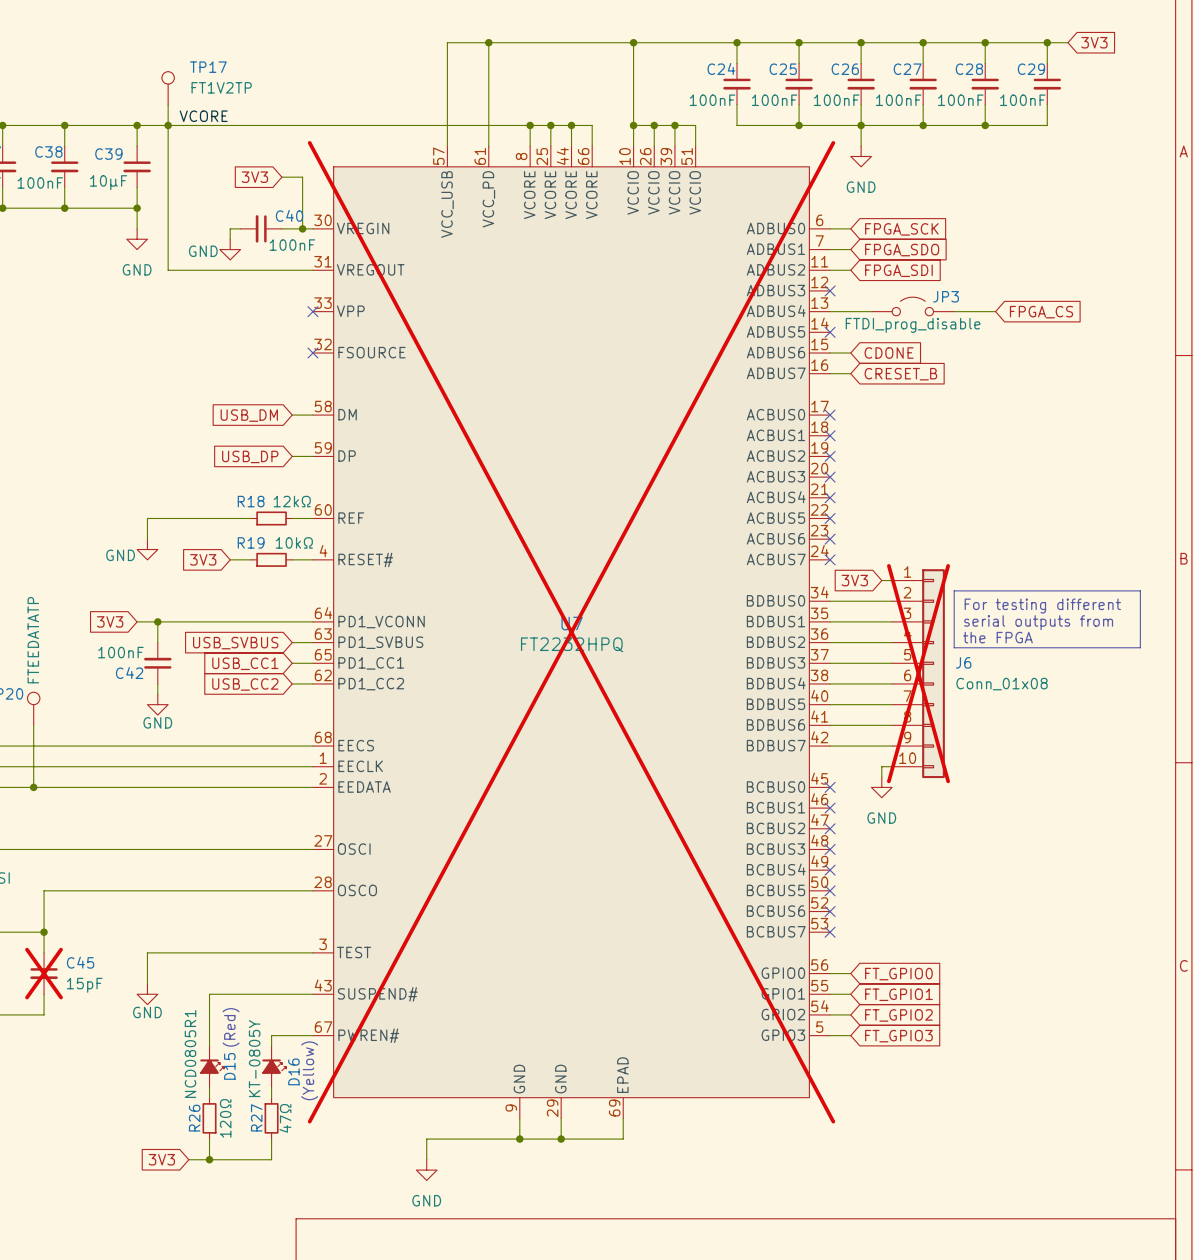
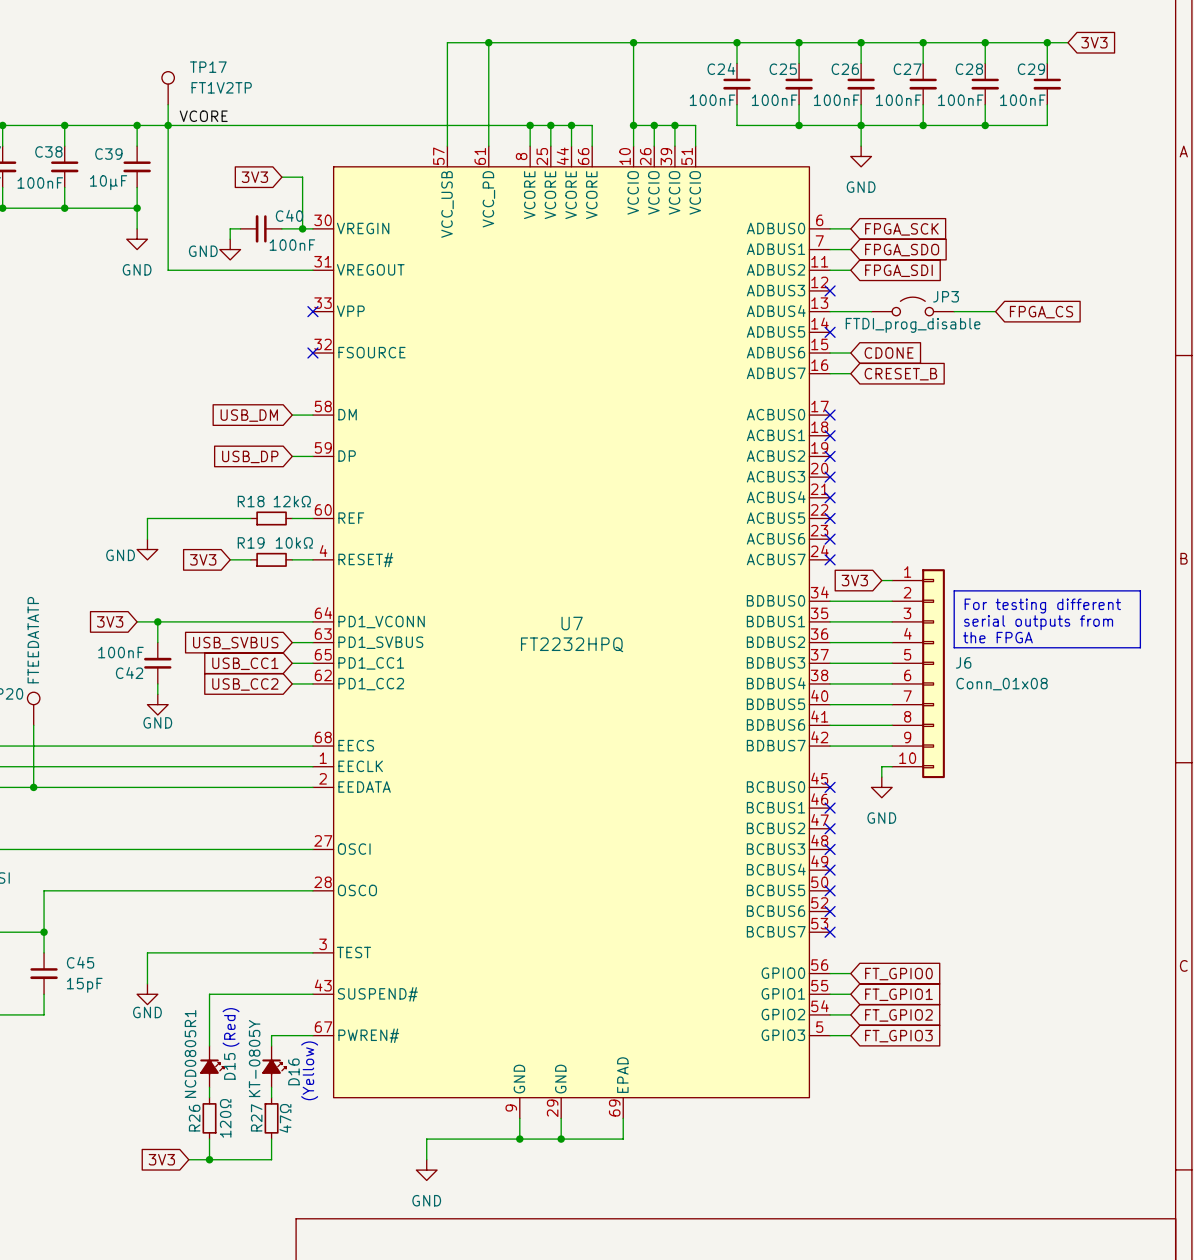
U7 do-not-place cross: (571, 632) -> none
J6 do-not-place cross: (918, 673) -> none
C45 do-not-place cross: (44, 973) -> none

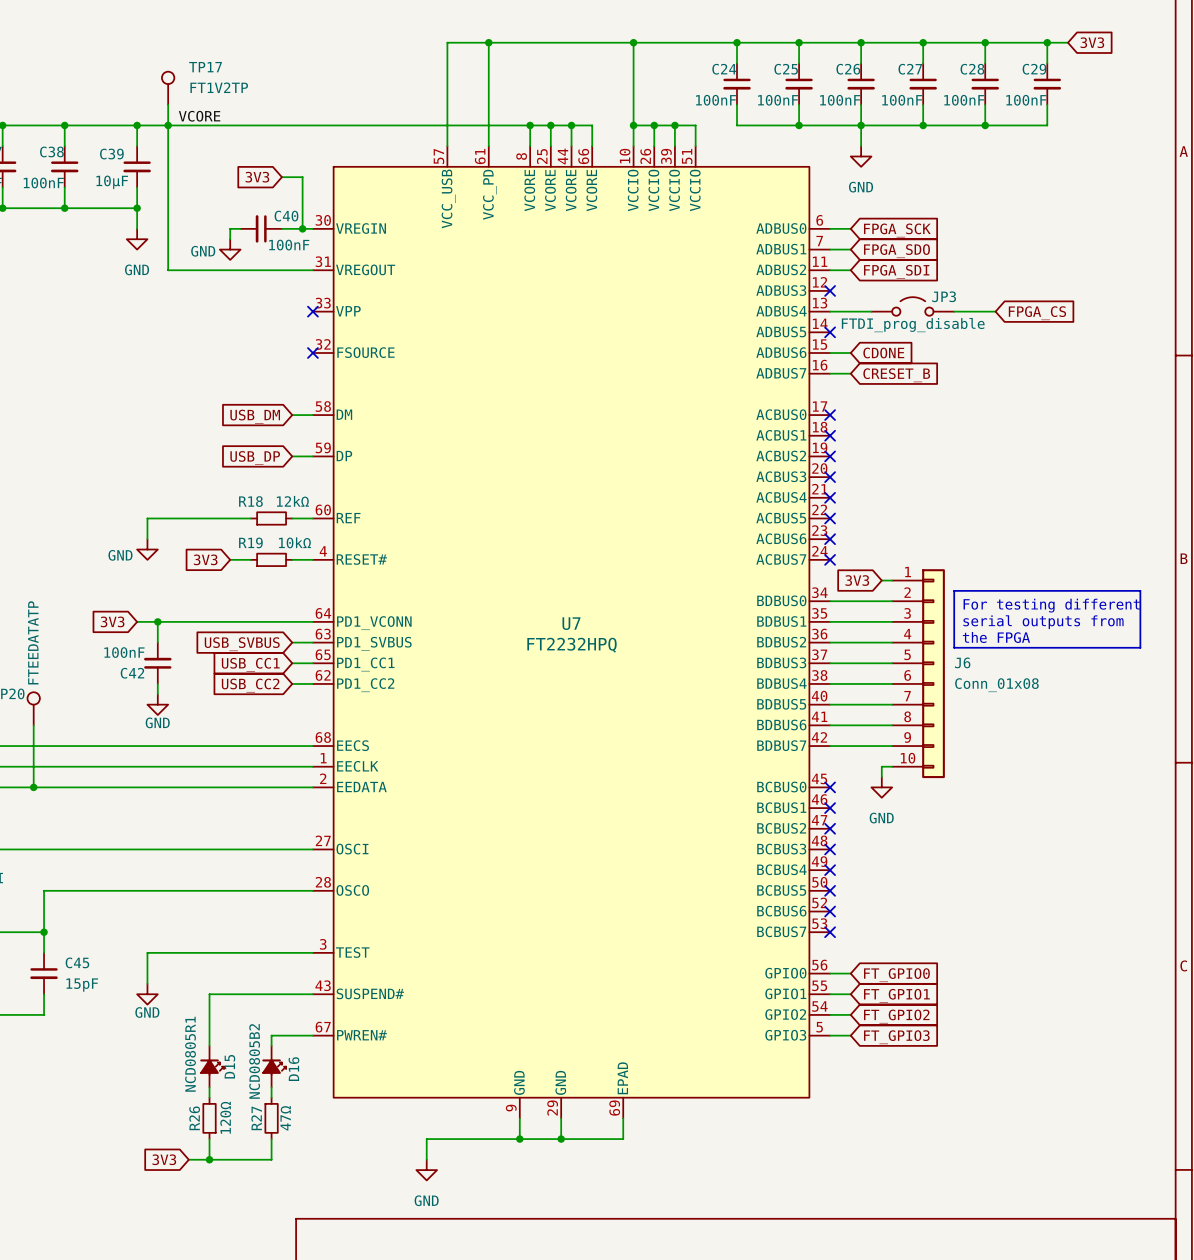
text: (Red) (231, 1027) -> none
D16 value: KT-0805Y (254, 1058) -> NCD0805B2 (254, 1061)
text: (Yellow) (309, 1070) -> none

